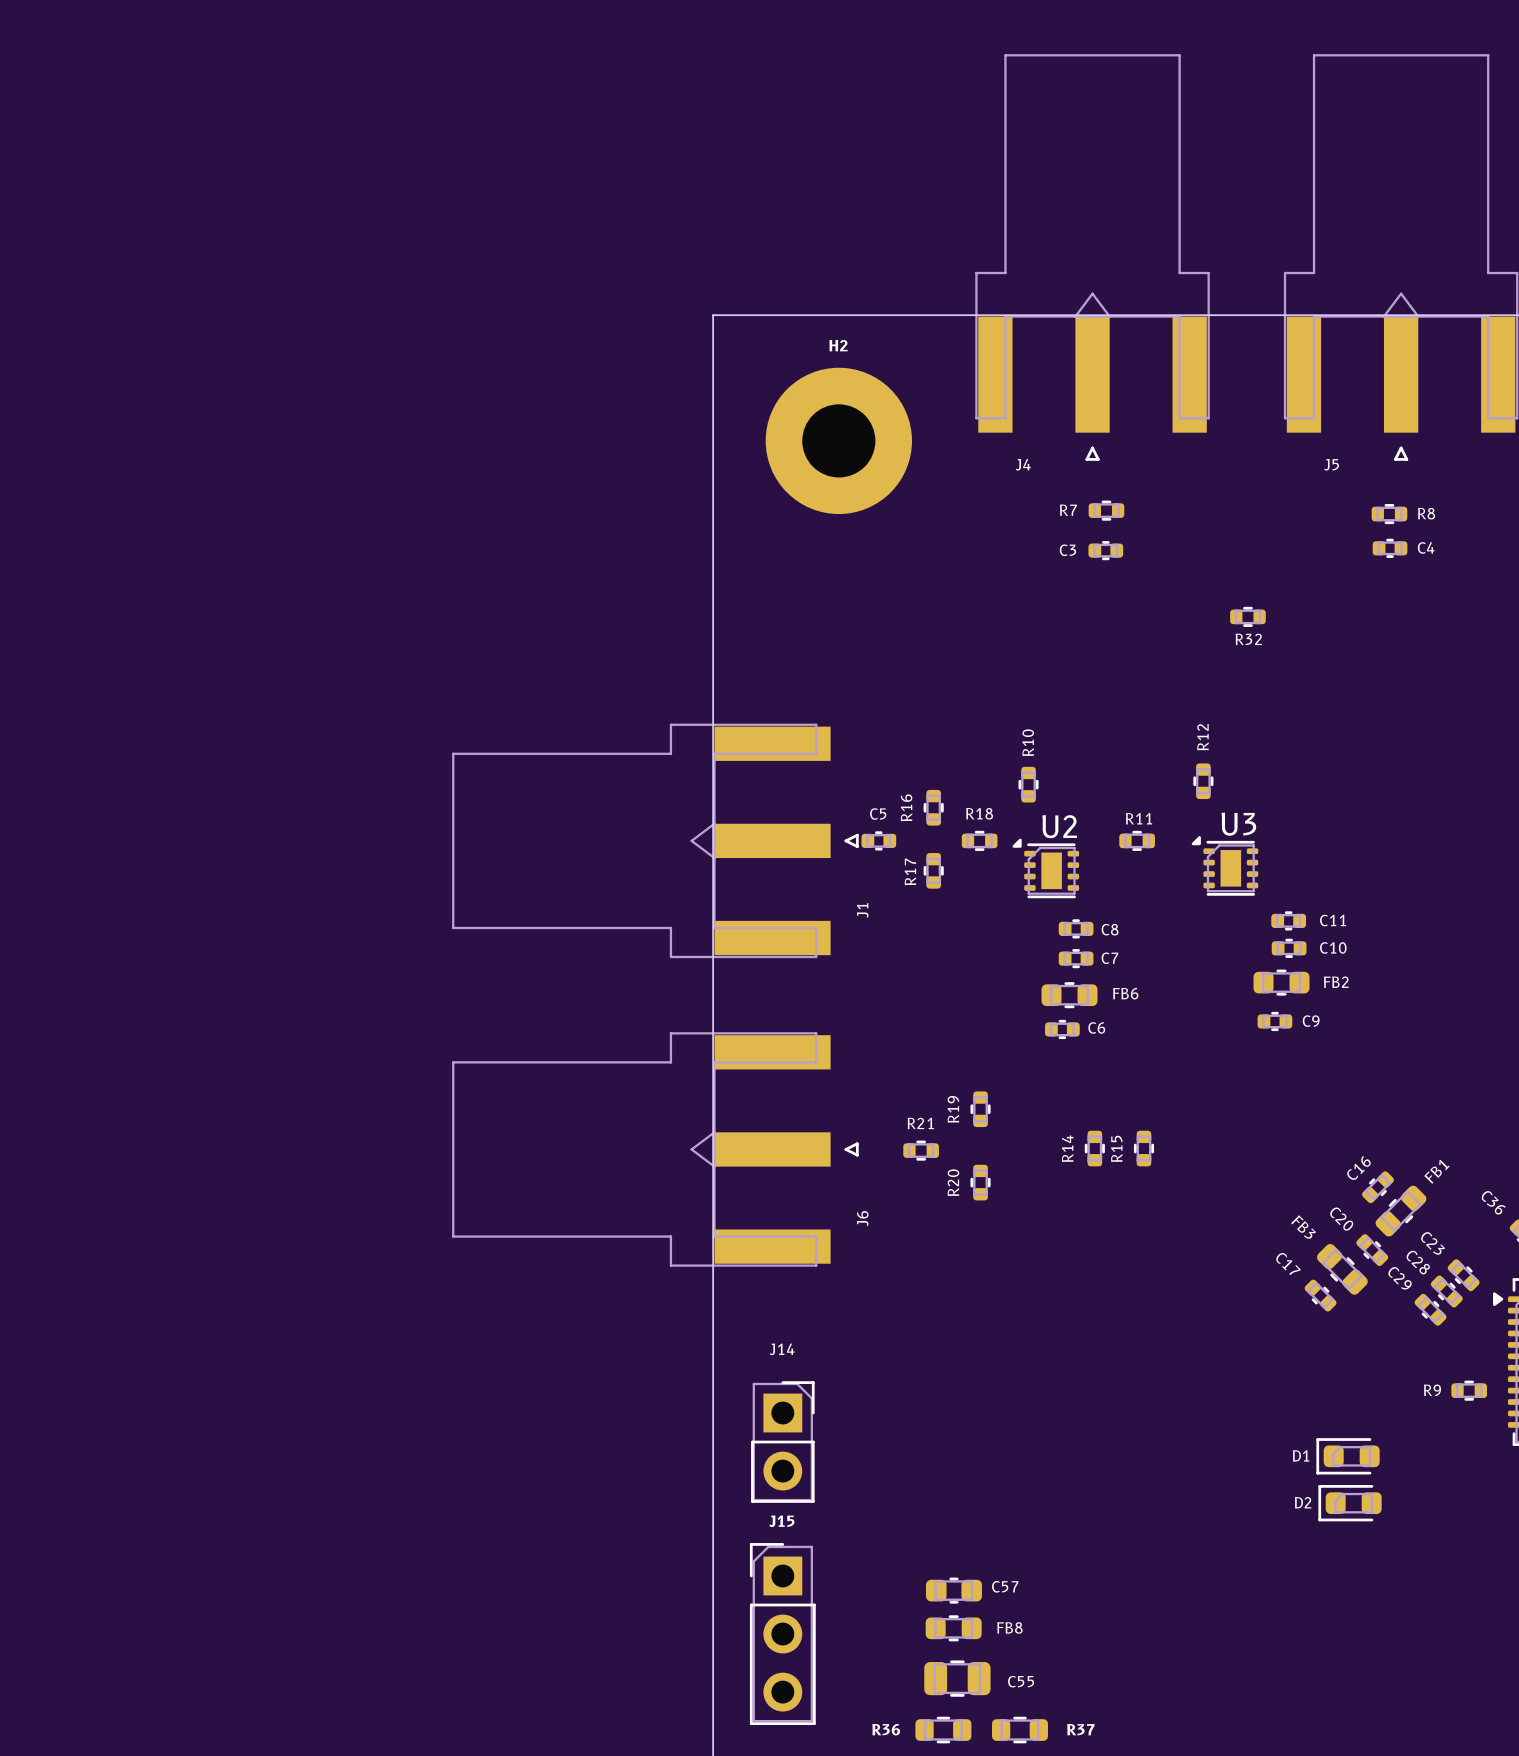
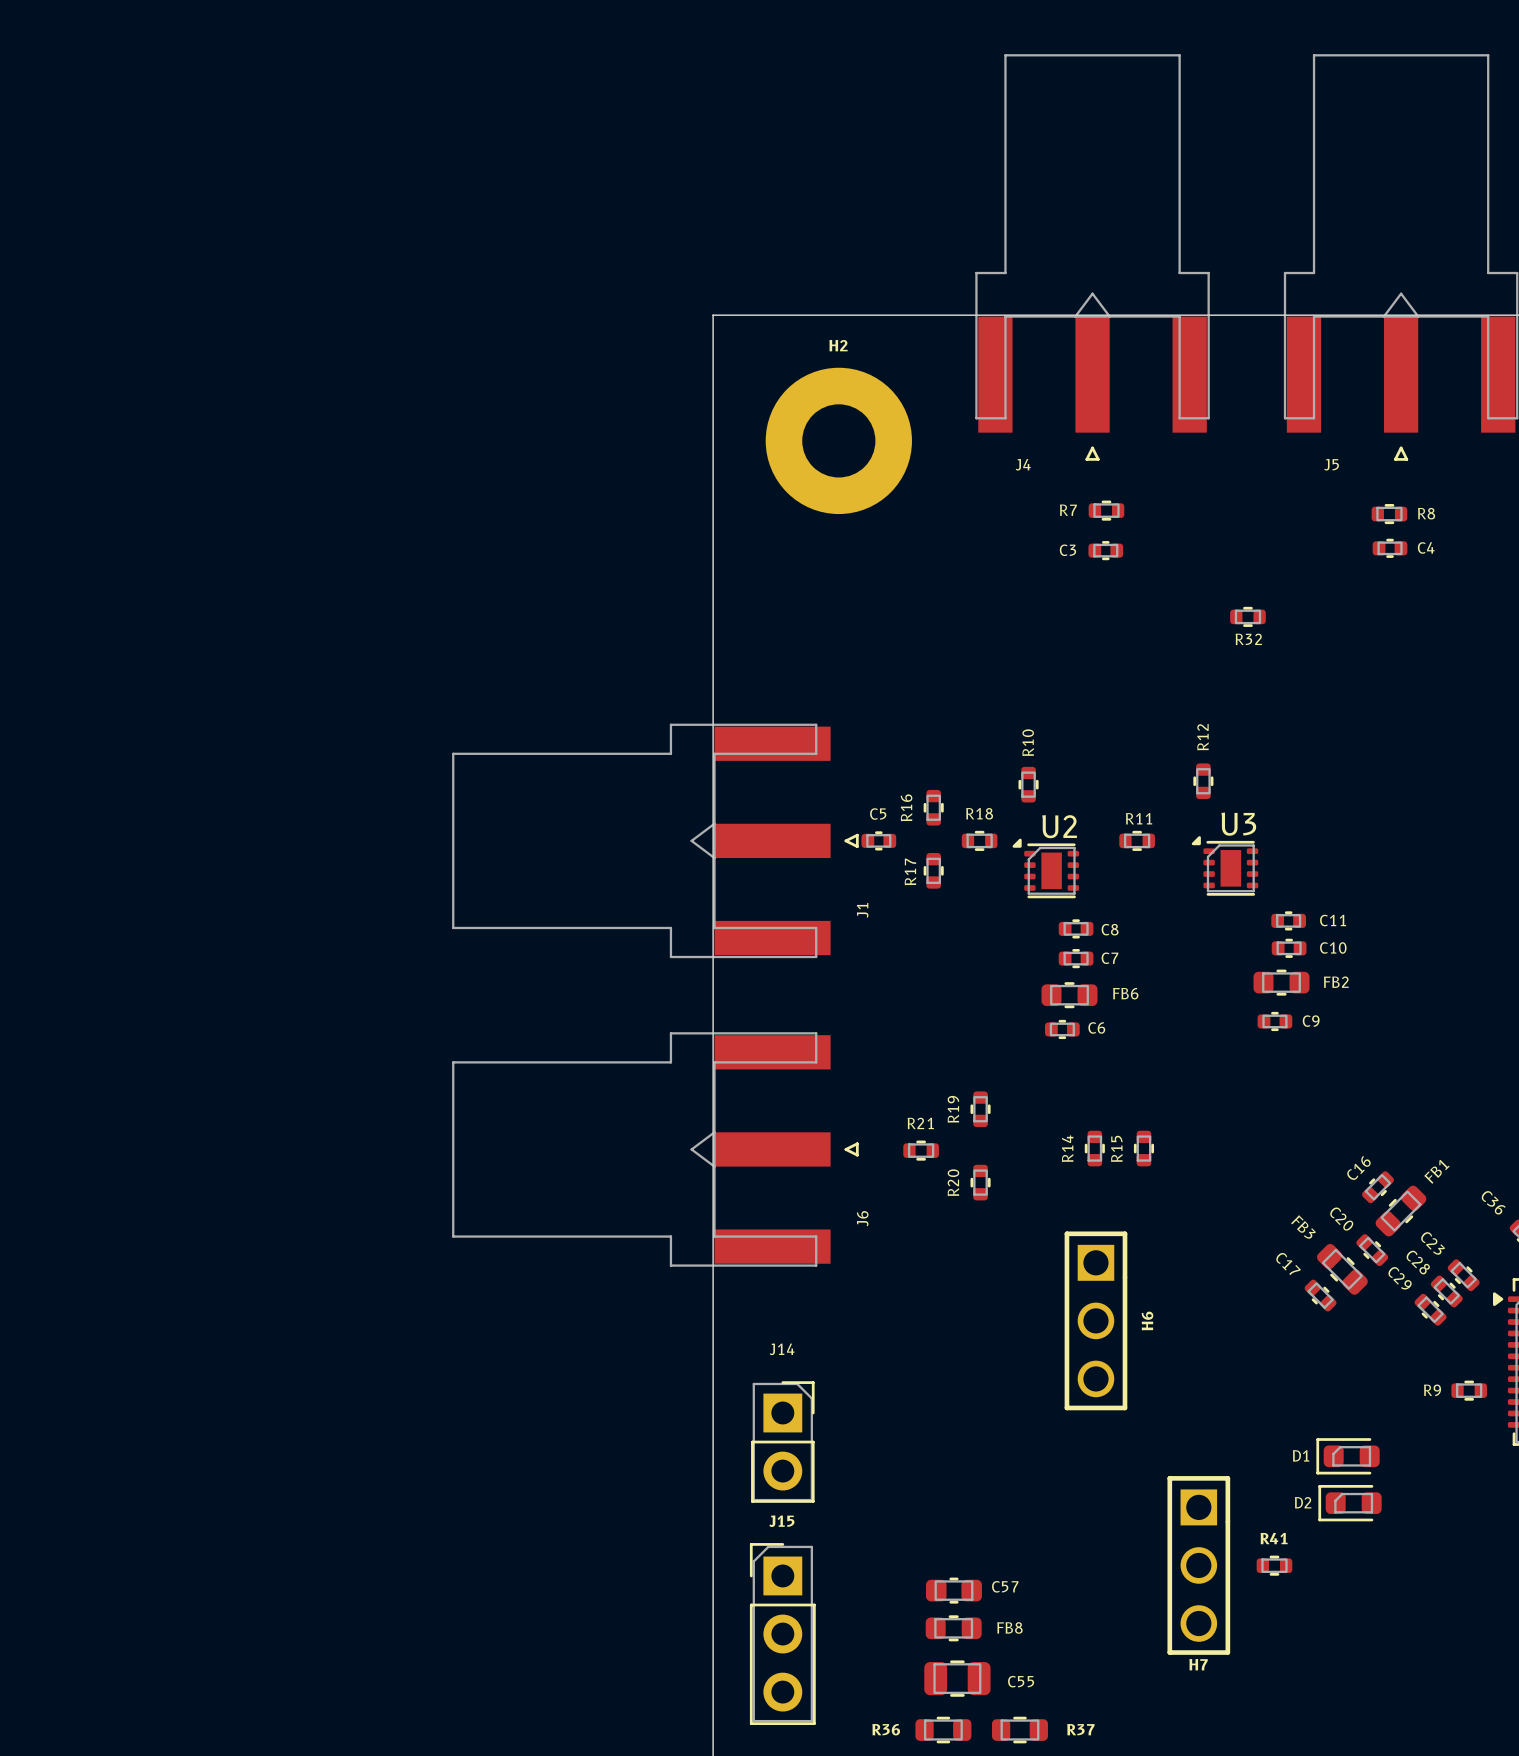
H6: none -> (1095, 1320)
H7: none -> (1198, 1565)
R41: none -> (1274, 1565)

